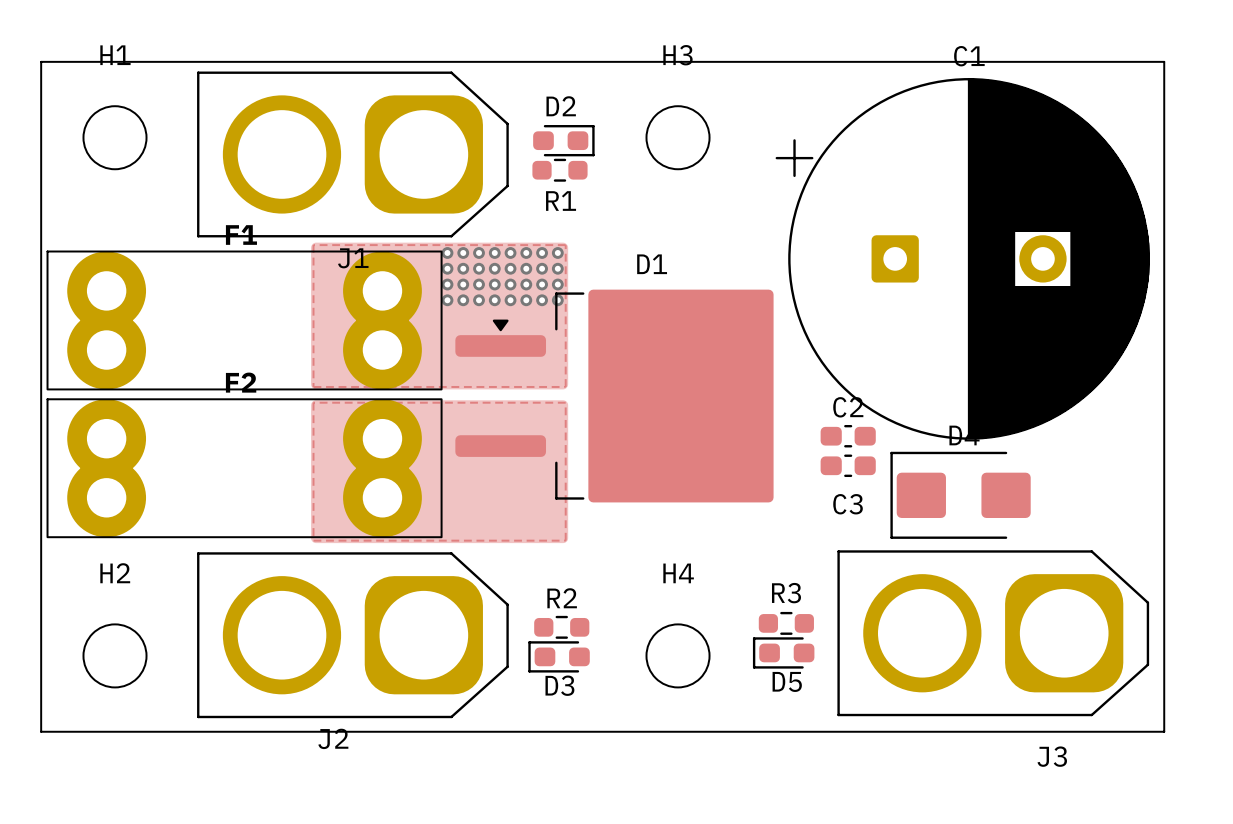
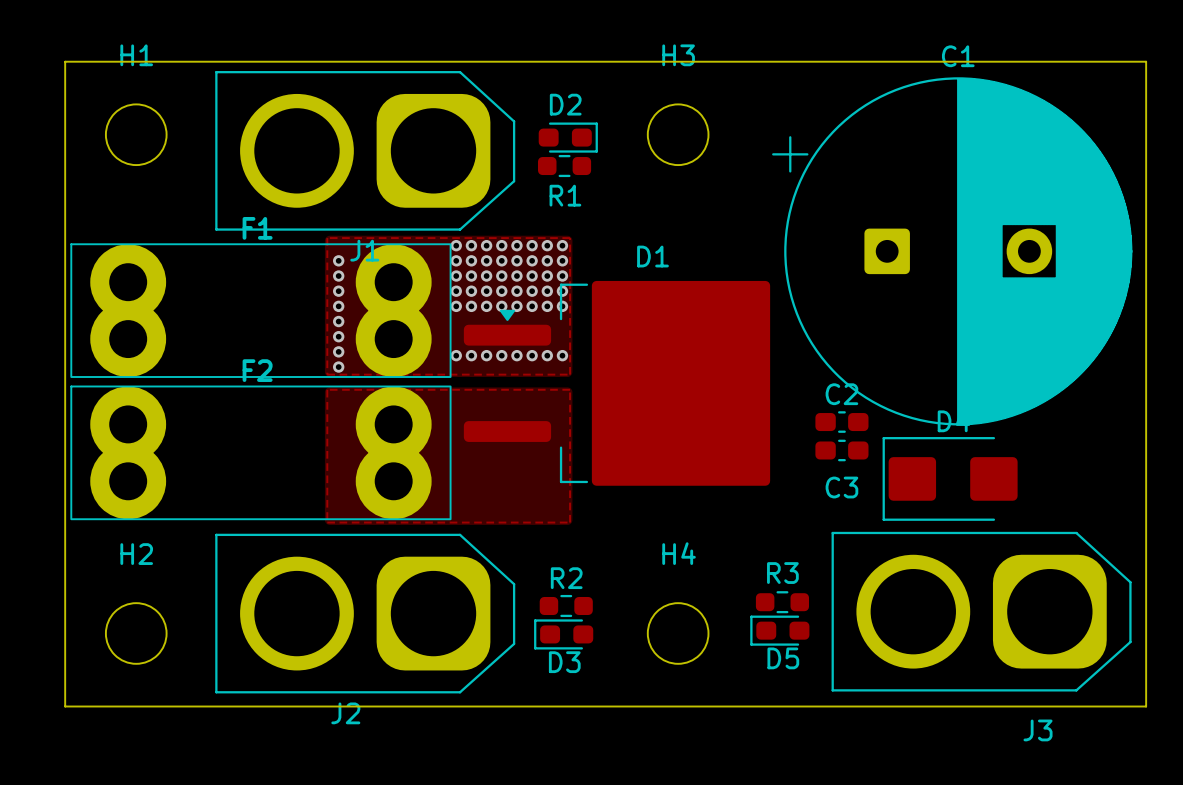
via: none -> (338, 260)
via: none -> (338, 276)
via: none -> (338, 291)
via: none -> (338, 306)
via: none -> (456, 306)
via: none -> (471, 306)
via: none -> (486, 306)
via: none -> (501, 306)
via: none -> (516, 306)
via: none -> (532, 306)
via: none -> (547, 306)
via: none -> (562, 306)
via: none -> (338, 321)
via: none -> (338, 336)
via: none -> (338, 351)
via: none -> (456, 355)
via: none -> (471, 355)
via: none -> (486, 355)
via: none -> (501, 355)
via: none -> (516, 355)
via: none -> (532, 355)
via: none -> (547, 355)
via: none -> (562, 355)
via: none -> (338, 367)

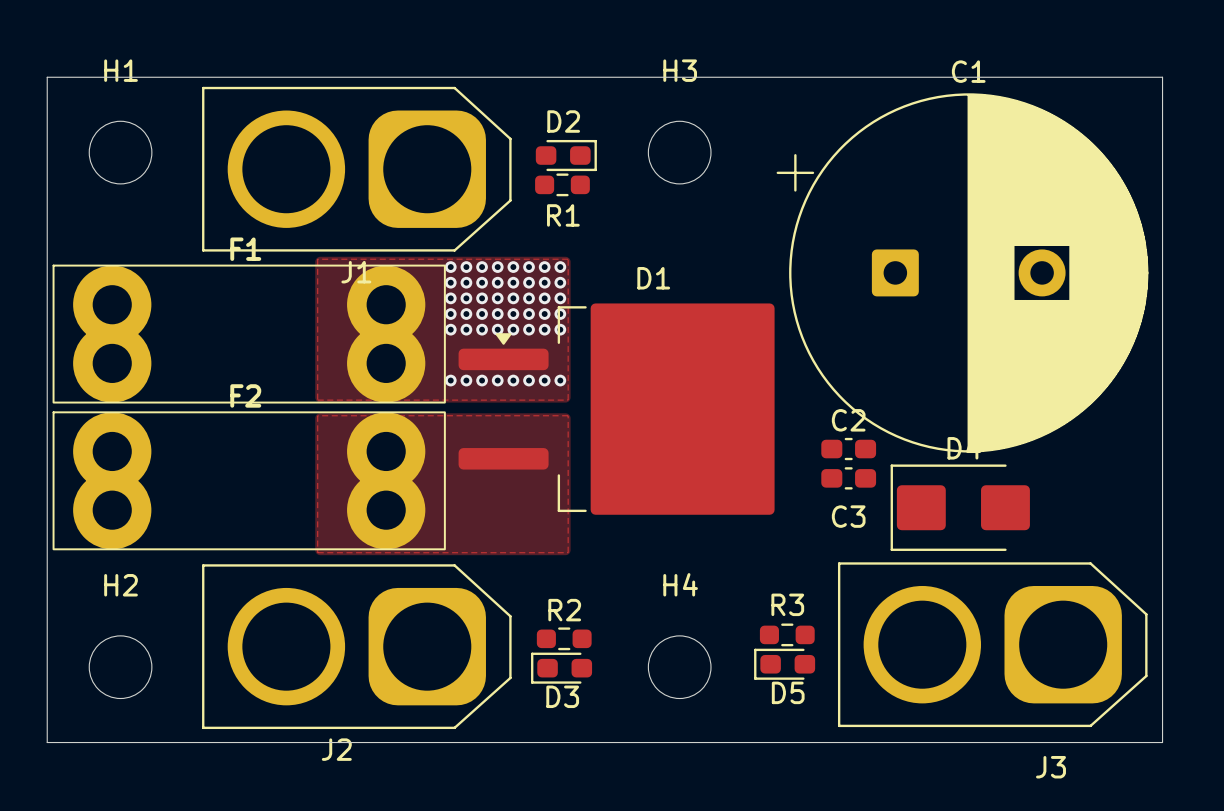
via: (338, 260) -> none
via: (338, 276) -> none
via: (338, 291) -> none
via: (338, 306) -> none
via: (338, 321) -> none
via: (338, 336) -> none
via: (338, 351) -> none
via: (338, 367) -> none

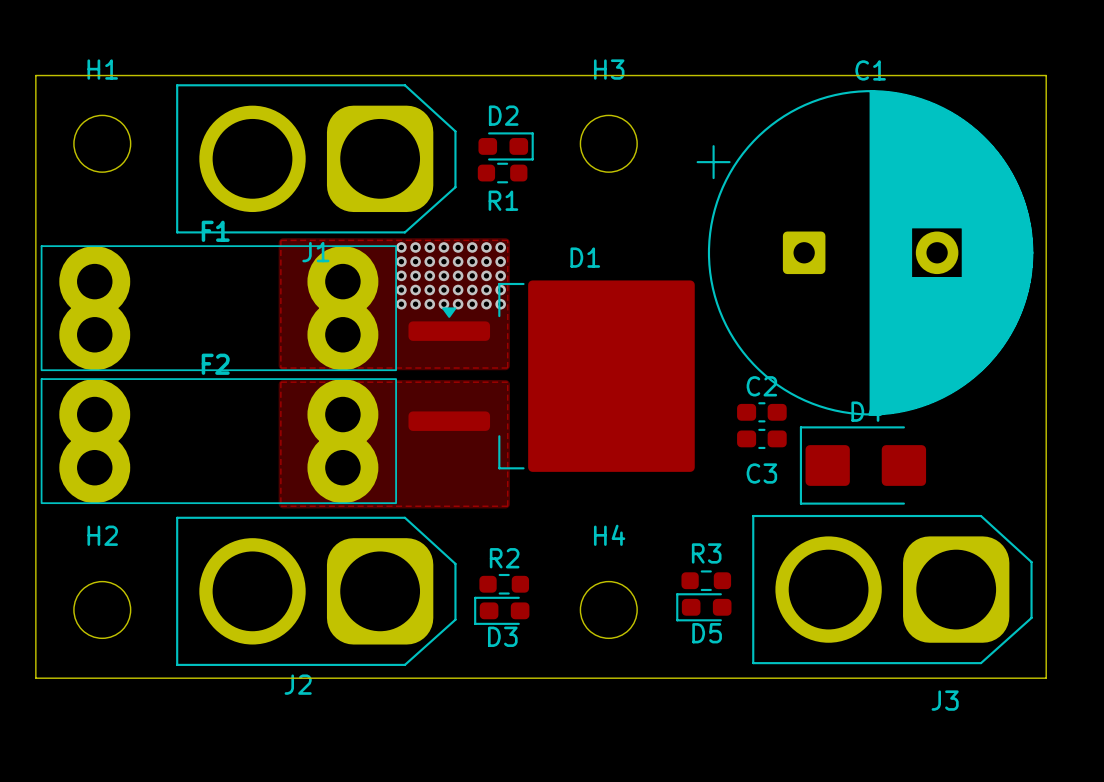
via: (450, 380) -> none
via: (466, 380) -> none
via: (482, 380) -> none
via: (497, 380) -> none
via: (513, 380) -> none
via: (529, 380) -> none
via: (544, 380) -> none
via: (560, 380) -> none

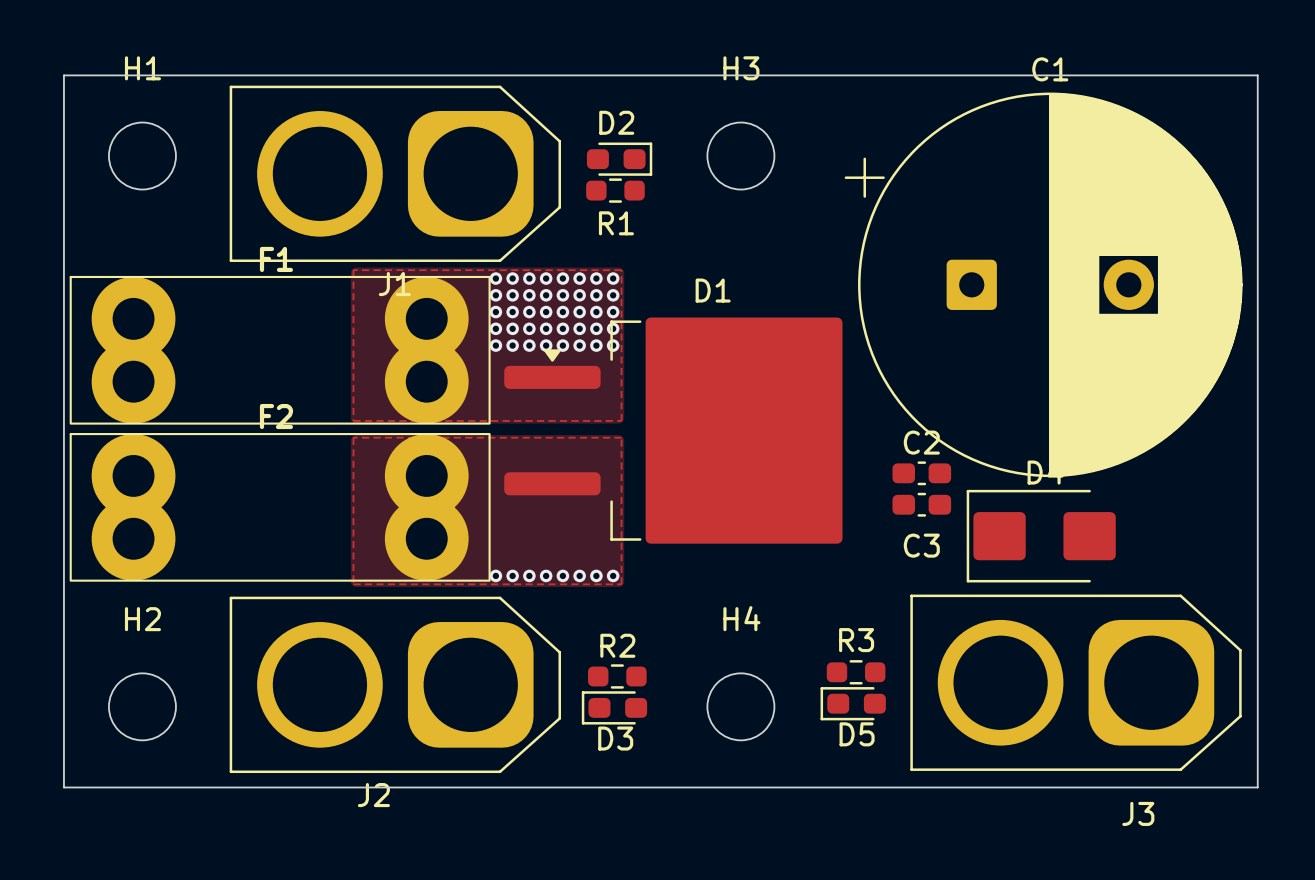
via: none -> (495, 575)
via: none -> (512, 575)
via: none -> (529, 575)
via: none -> (546, 575)
via: none -> (562, 575)
via: none -> (579, 575)
via: none -> (596, 575)
via: none -> (613, 575)

